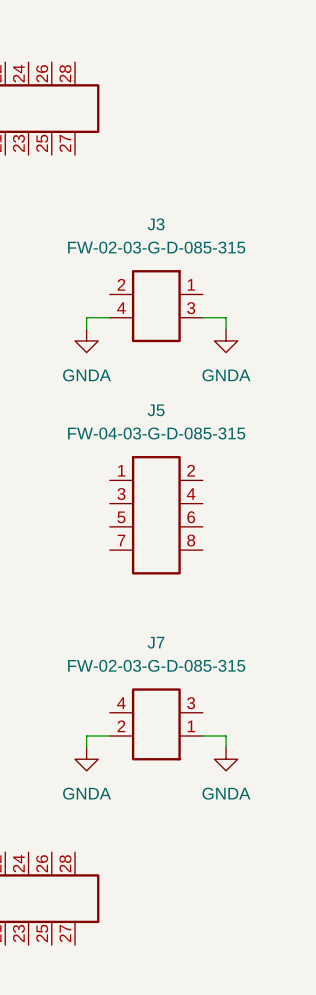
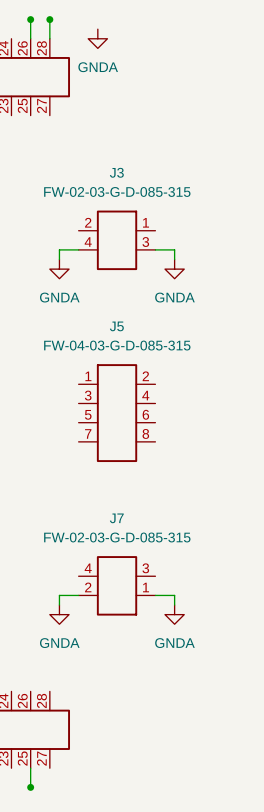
wire: none -> (30, 19) (30, 38)
junction: none -> (30, 19)
wire: none -> (49, 19) (49, 38)
junction: none -> (49, 19)
power symbol: none -> GNDA (97, 38)
wire: none -> (30, 768) (30, 787)
junction: none -> (30, 787)

